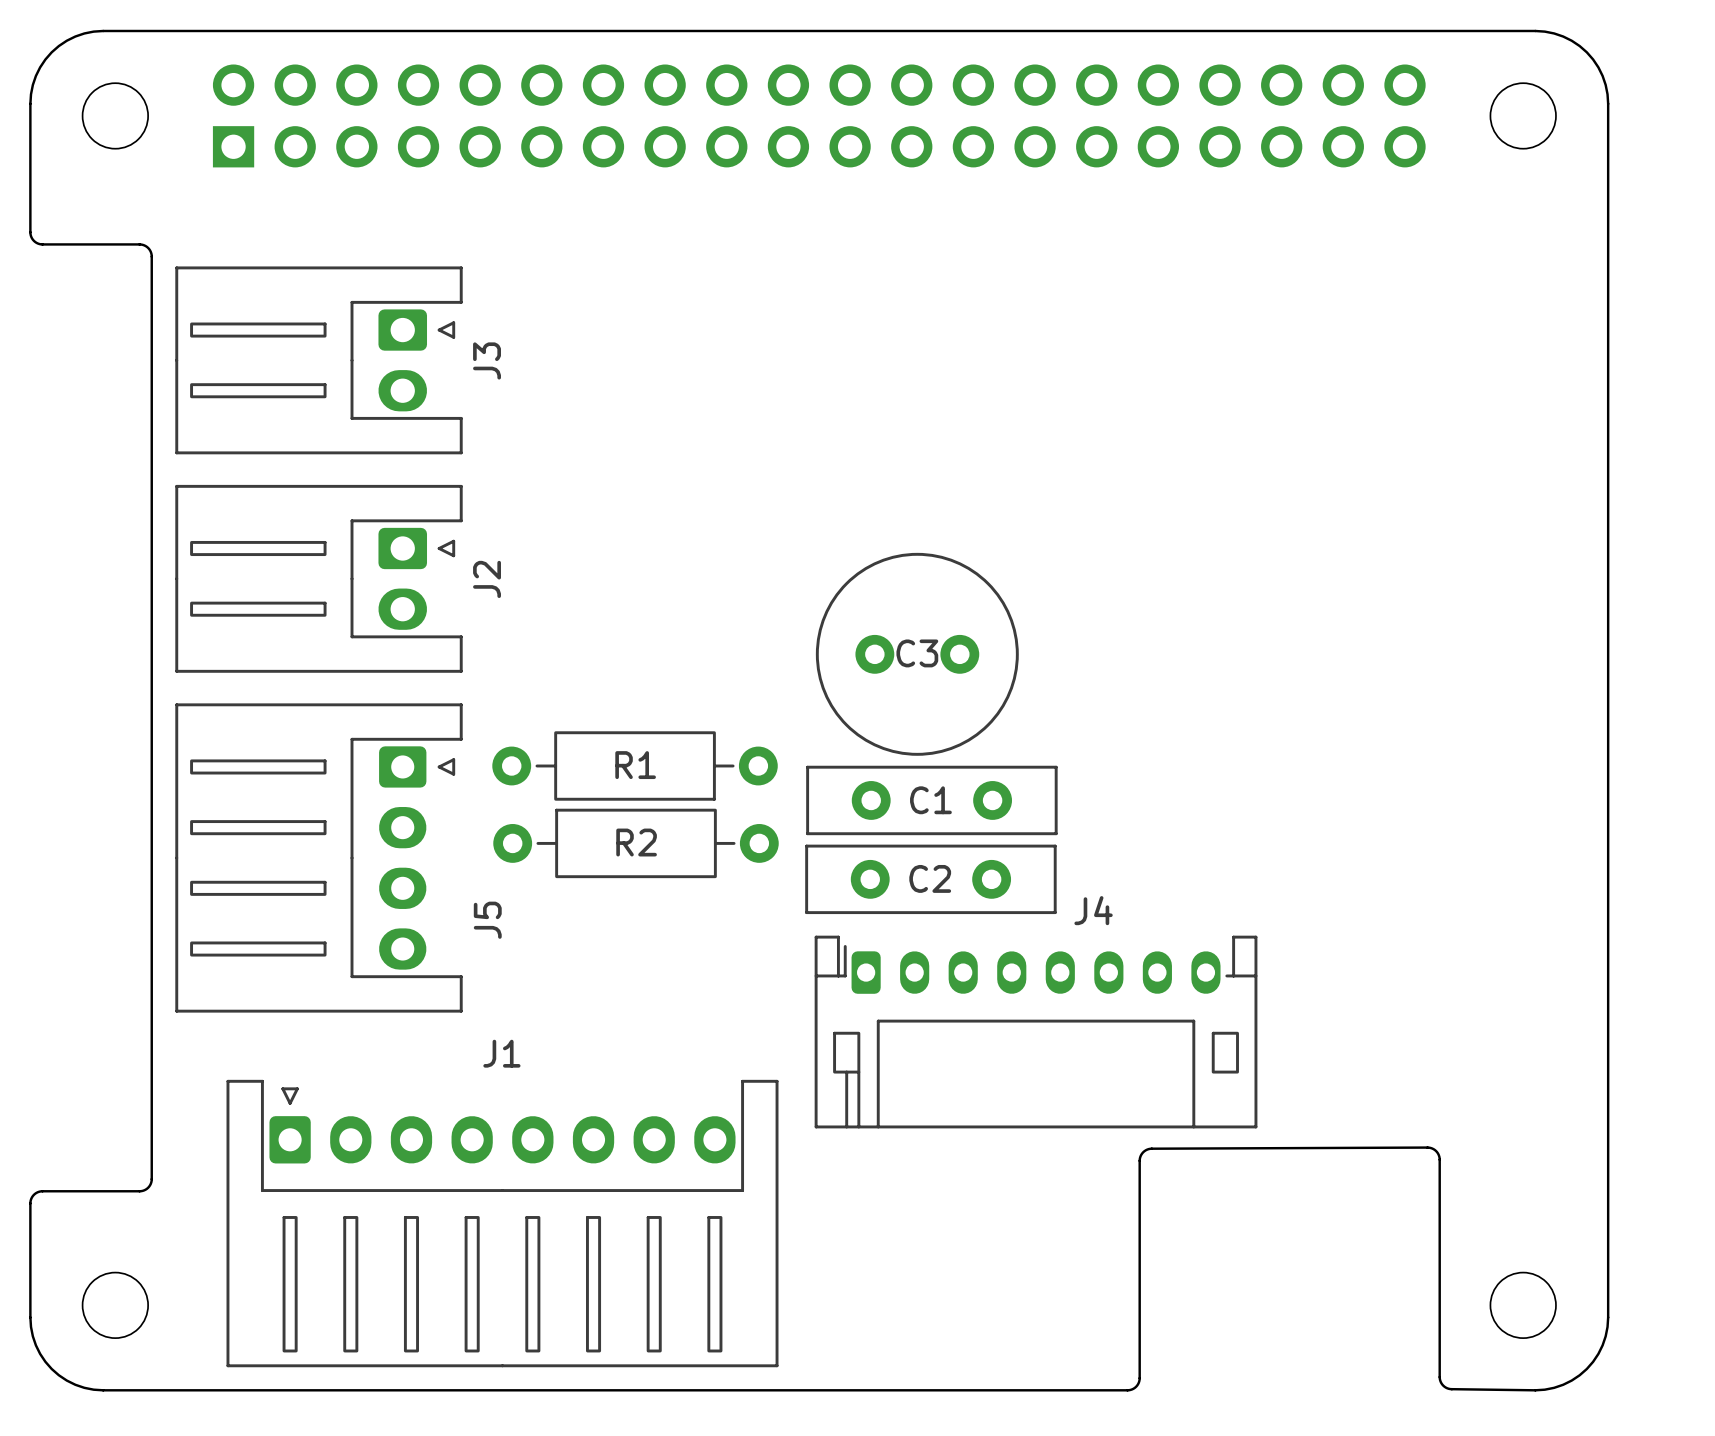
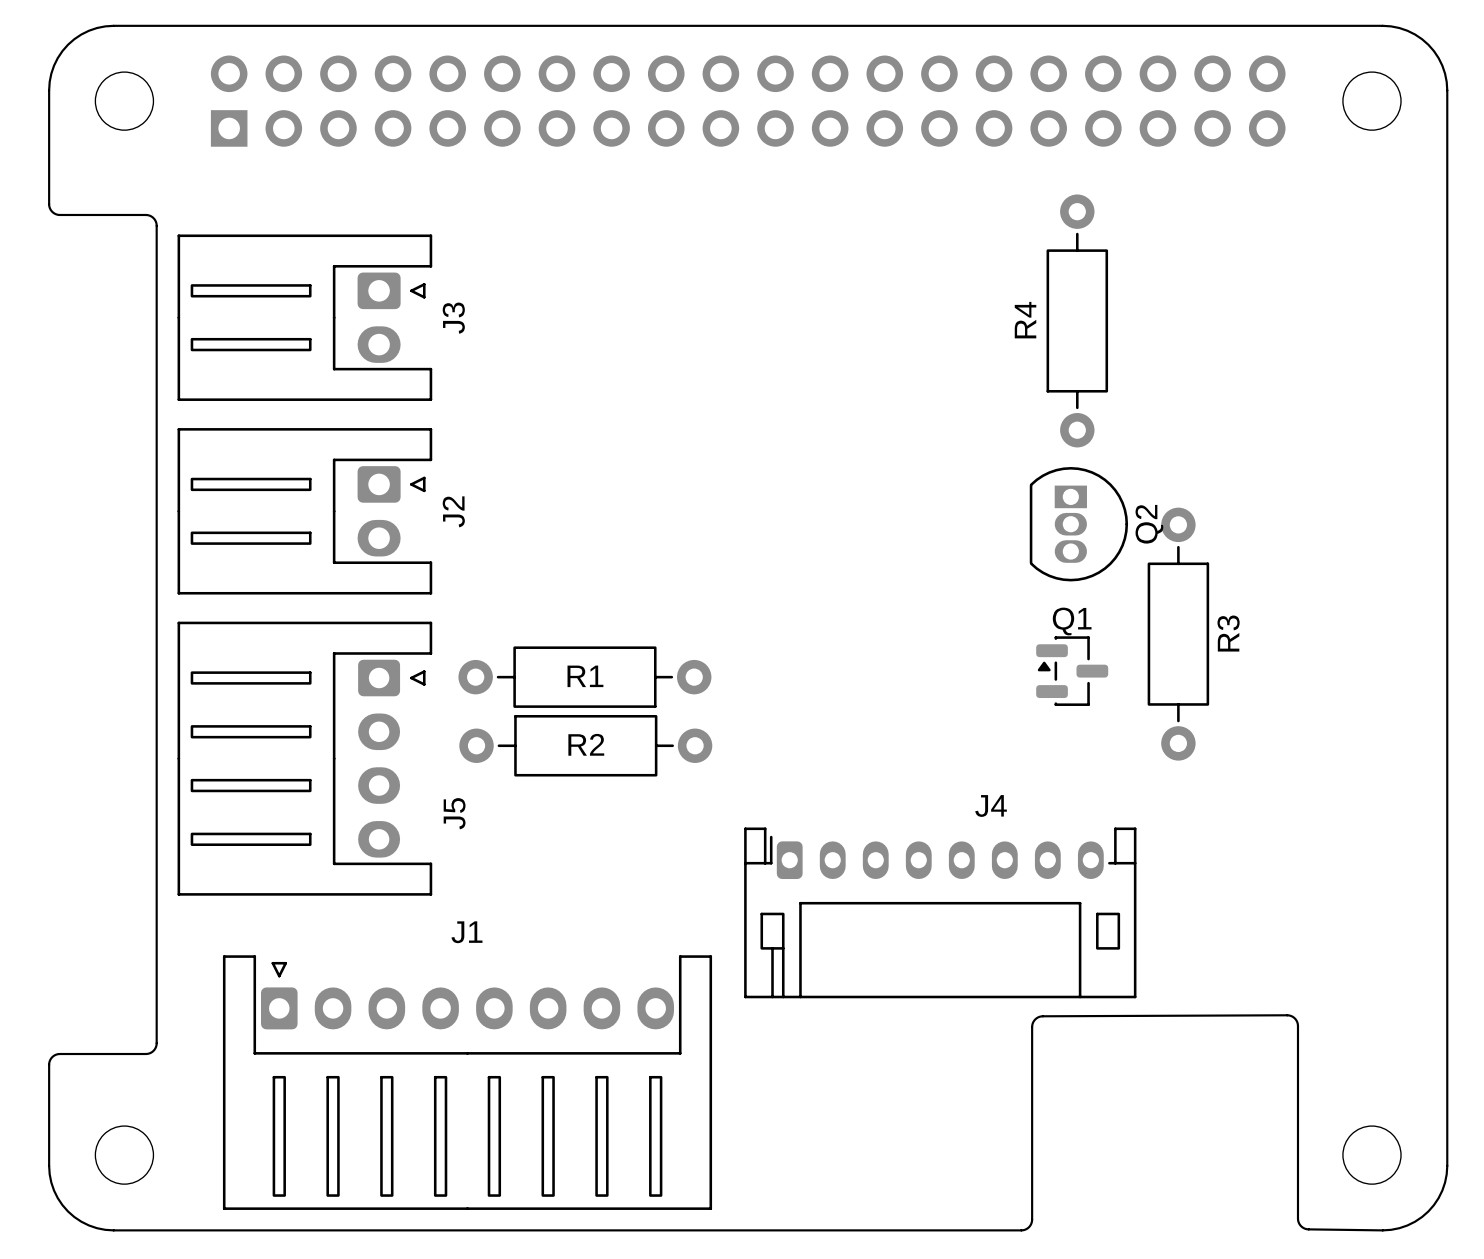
R4: none -> (1077, 320)
Q2: none -> (1078, 524)
C3: (917, 654) -> none
R3: none -> (1178, 634)
Q1: none -> (1072, 671)
C1: (931, 800) -> none
C2: (930, 879) -> none

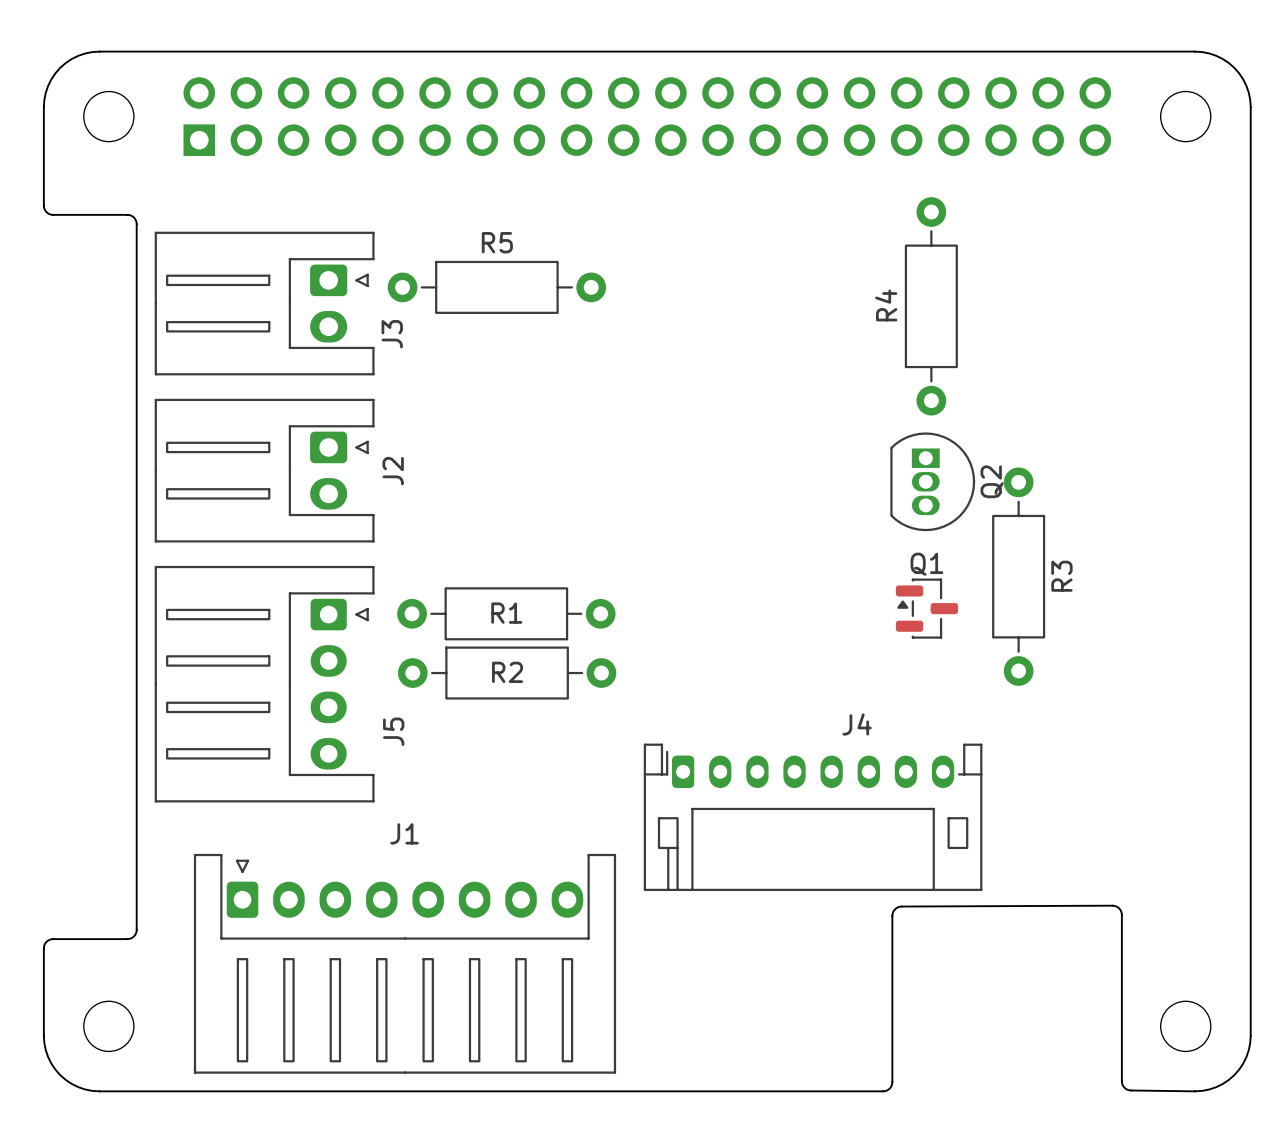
R5: none -> (496, 287)
J3 name position: J3 (453, 318) -> J3 (392, 334)

